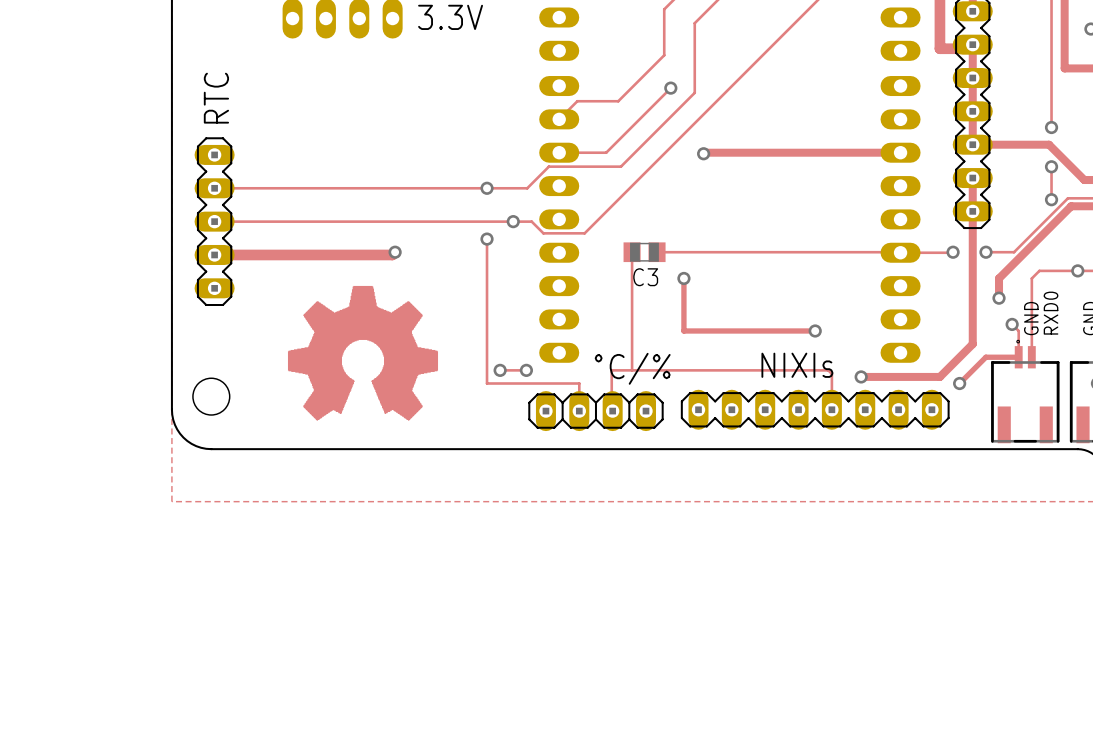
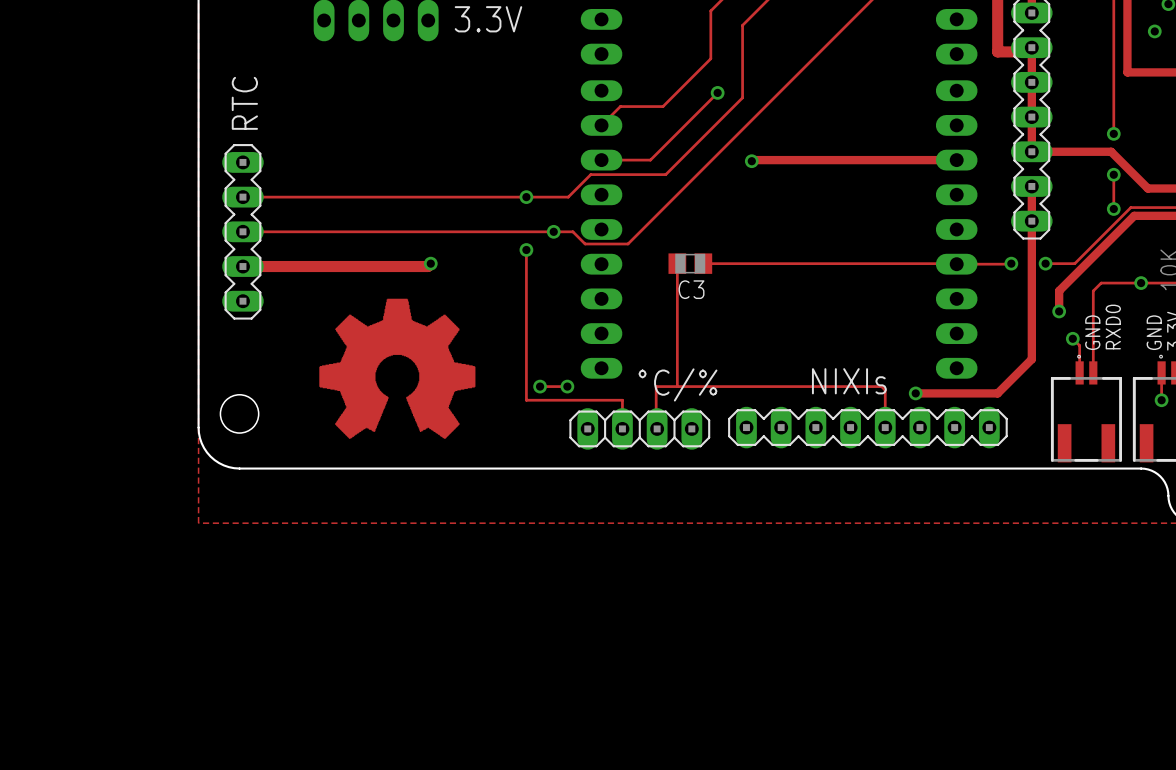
track: (683, 278) (683, 330) (815, 330) -> none
via: (683, 278) -> none
via: (815, 330) -> none
track: (1018, 357) (985, 357) (959, 383) -> none
via: (959, 383) -> none

